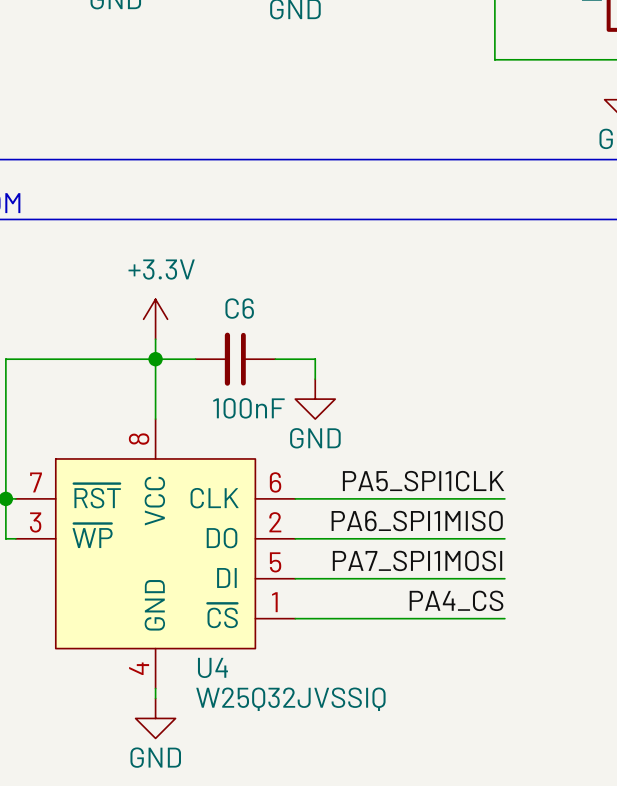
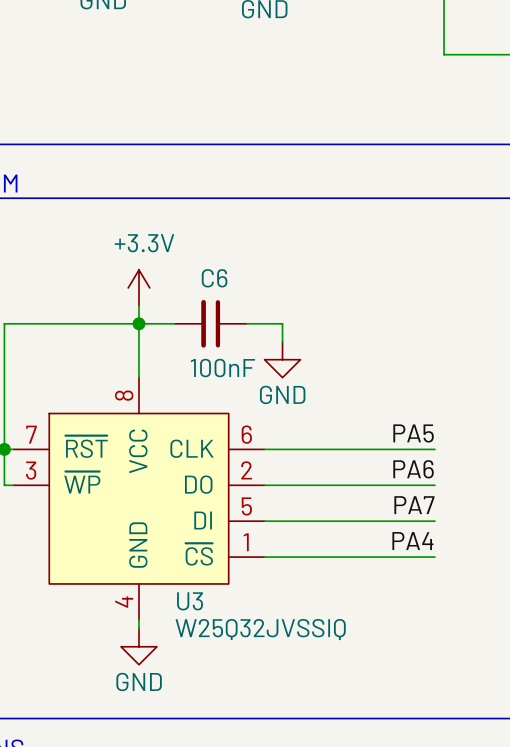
label: PA5_SPI1CLK (423, 481) -> none
label: none -> PA5 (413, 433)
wire: (484, 498) (504, 498) -> none
label: none -> PA6 (413, 469)
label: PA6_SPI1MISO (417, 521) -> none
wire: (484, 538) (504, 538) -> none
label: PA7_SPI1MOSI (417, 560) -> none
label: none -> PA7 (414, 505)
wire: (484, 578) (504, 578) -> none
label: PA4_CS (456, 600) -> PA4 (412, 541)
wire: (484, 618) (504, 618) -> none
U4 name: U4 (212, 667) -> U3 (190, 601)

